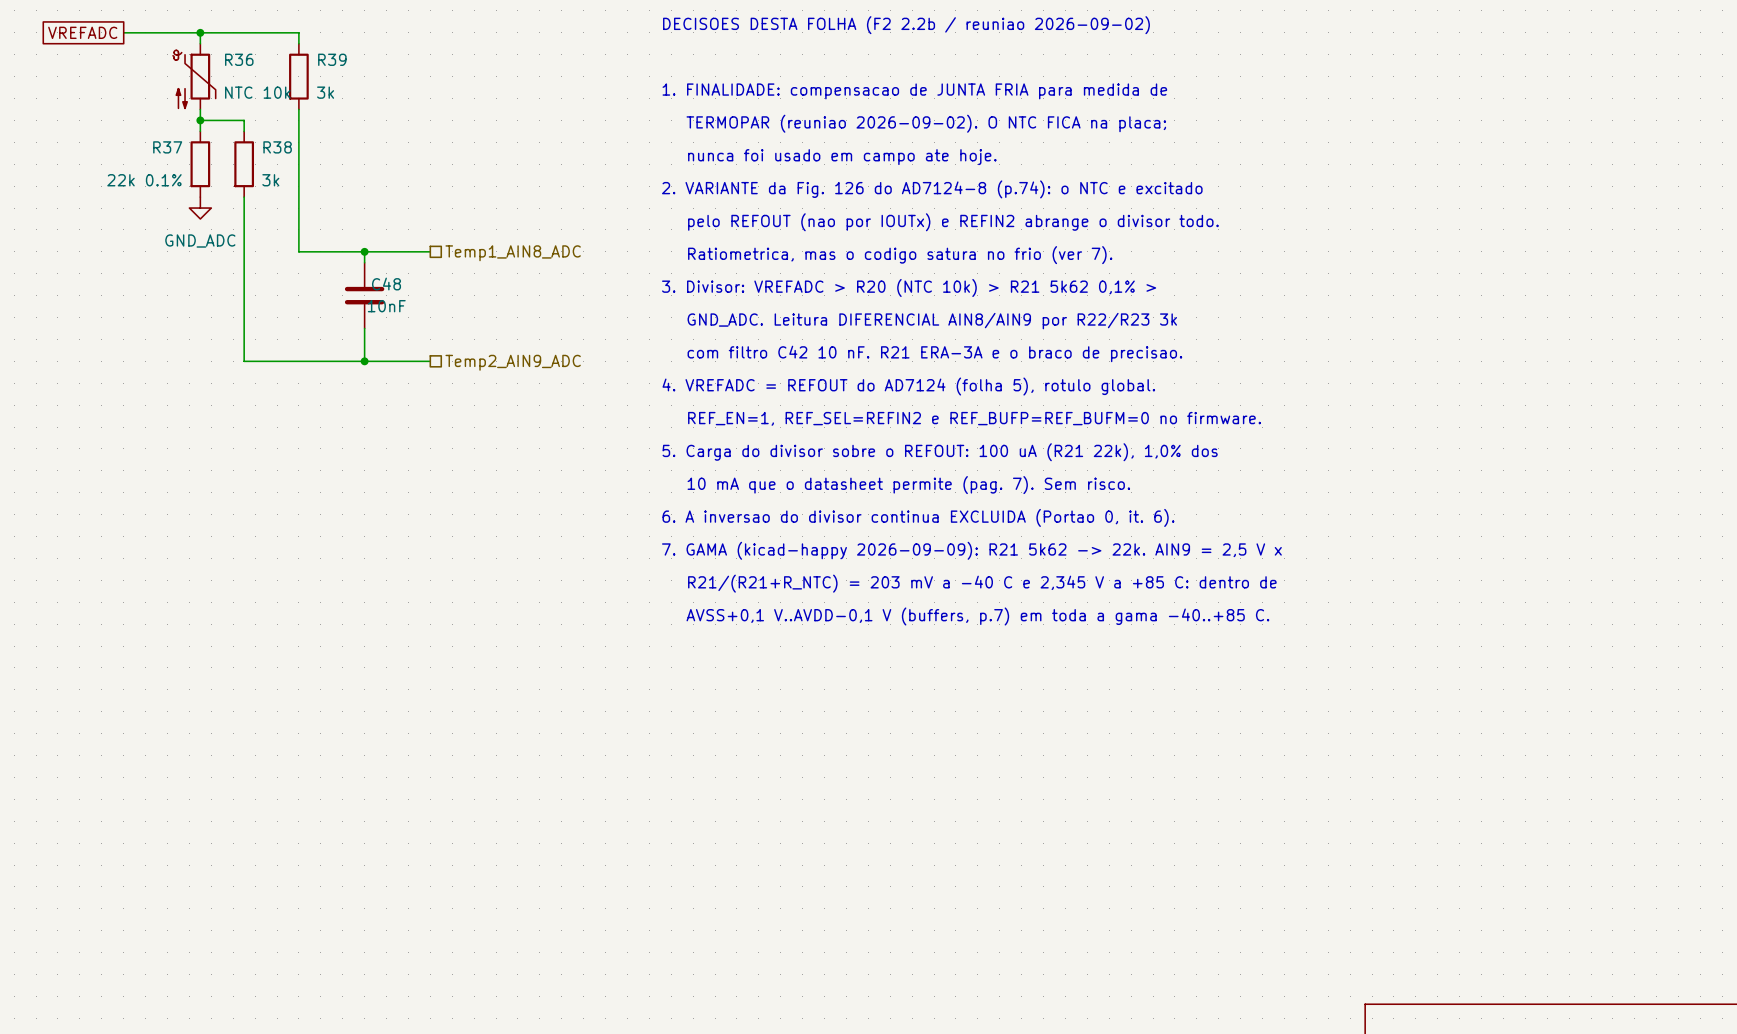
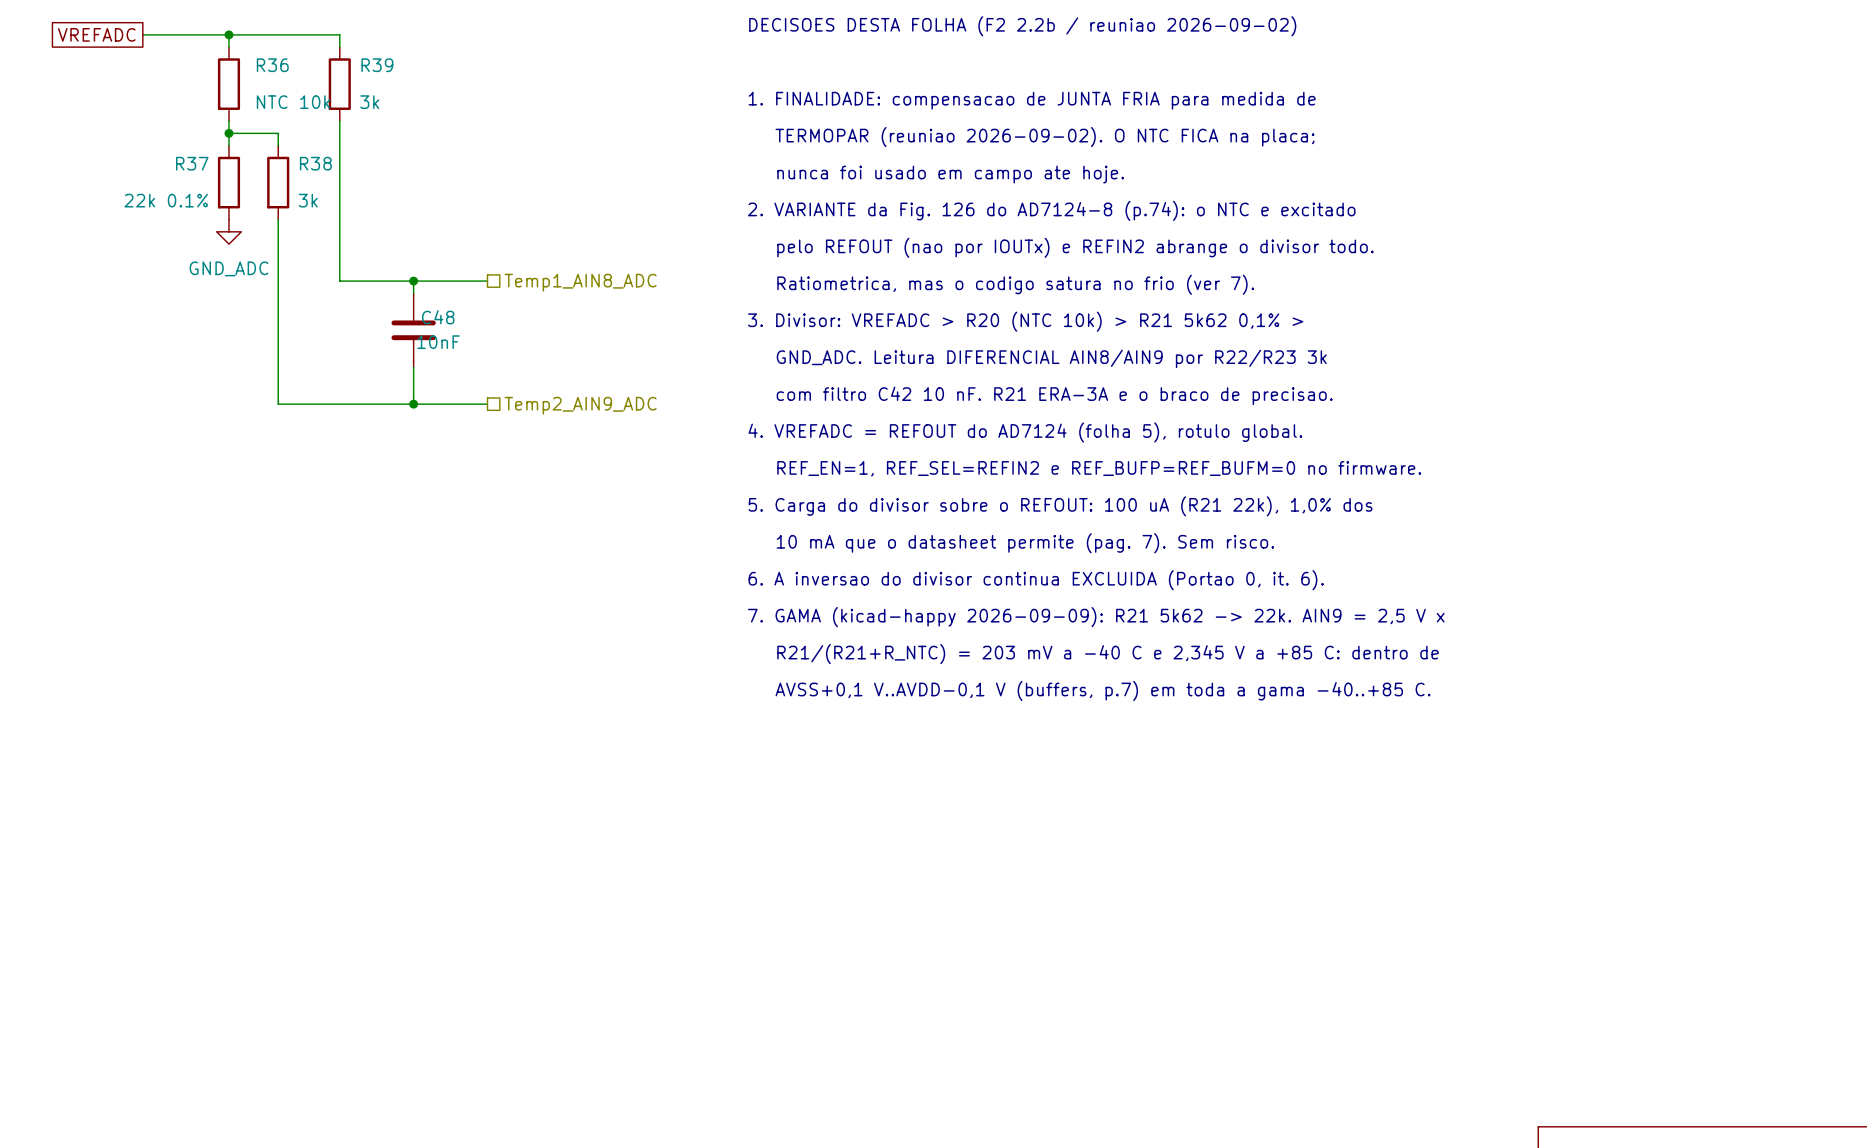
R36 symbol: [172, 43, 216, 110] -> [217, 47, 241, 122]

